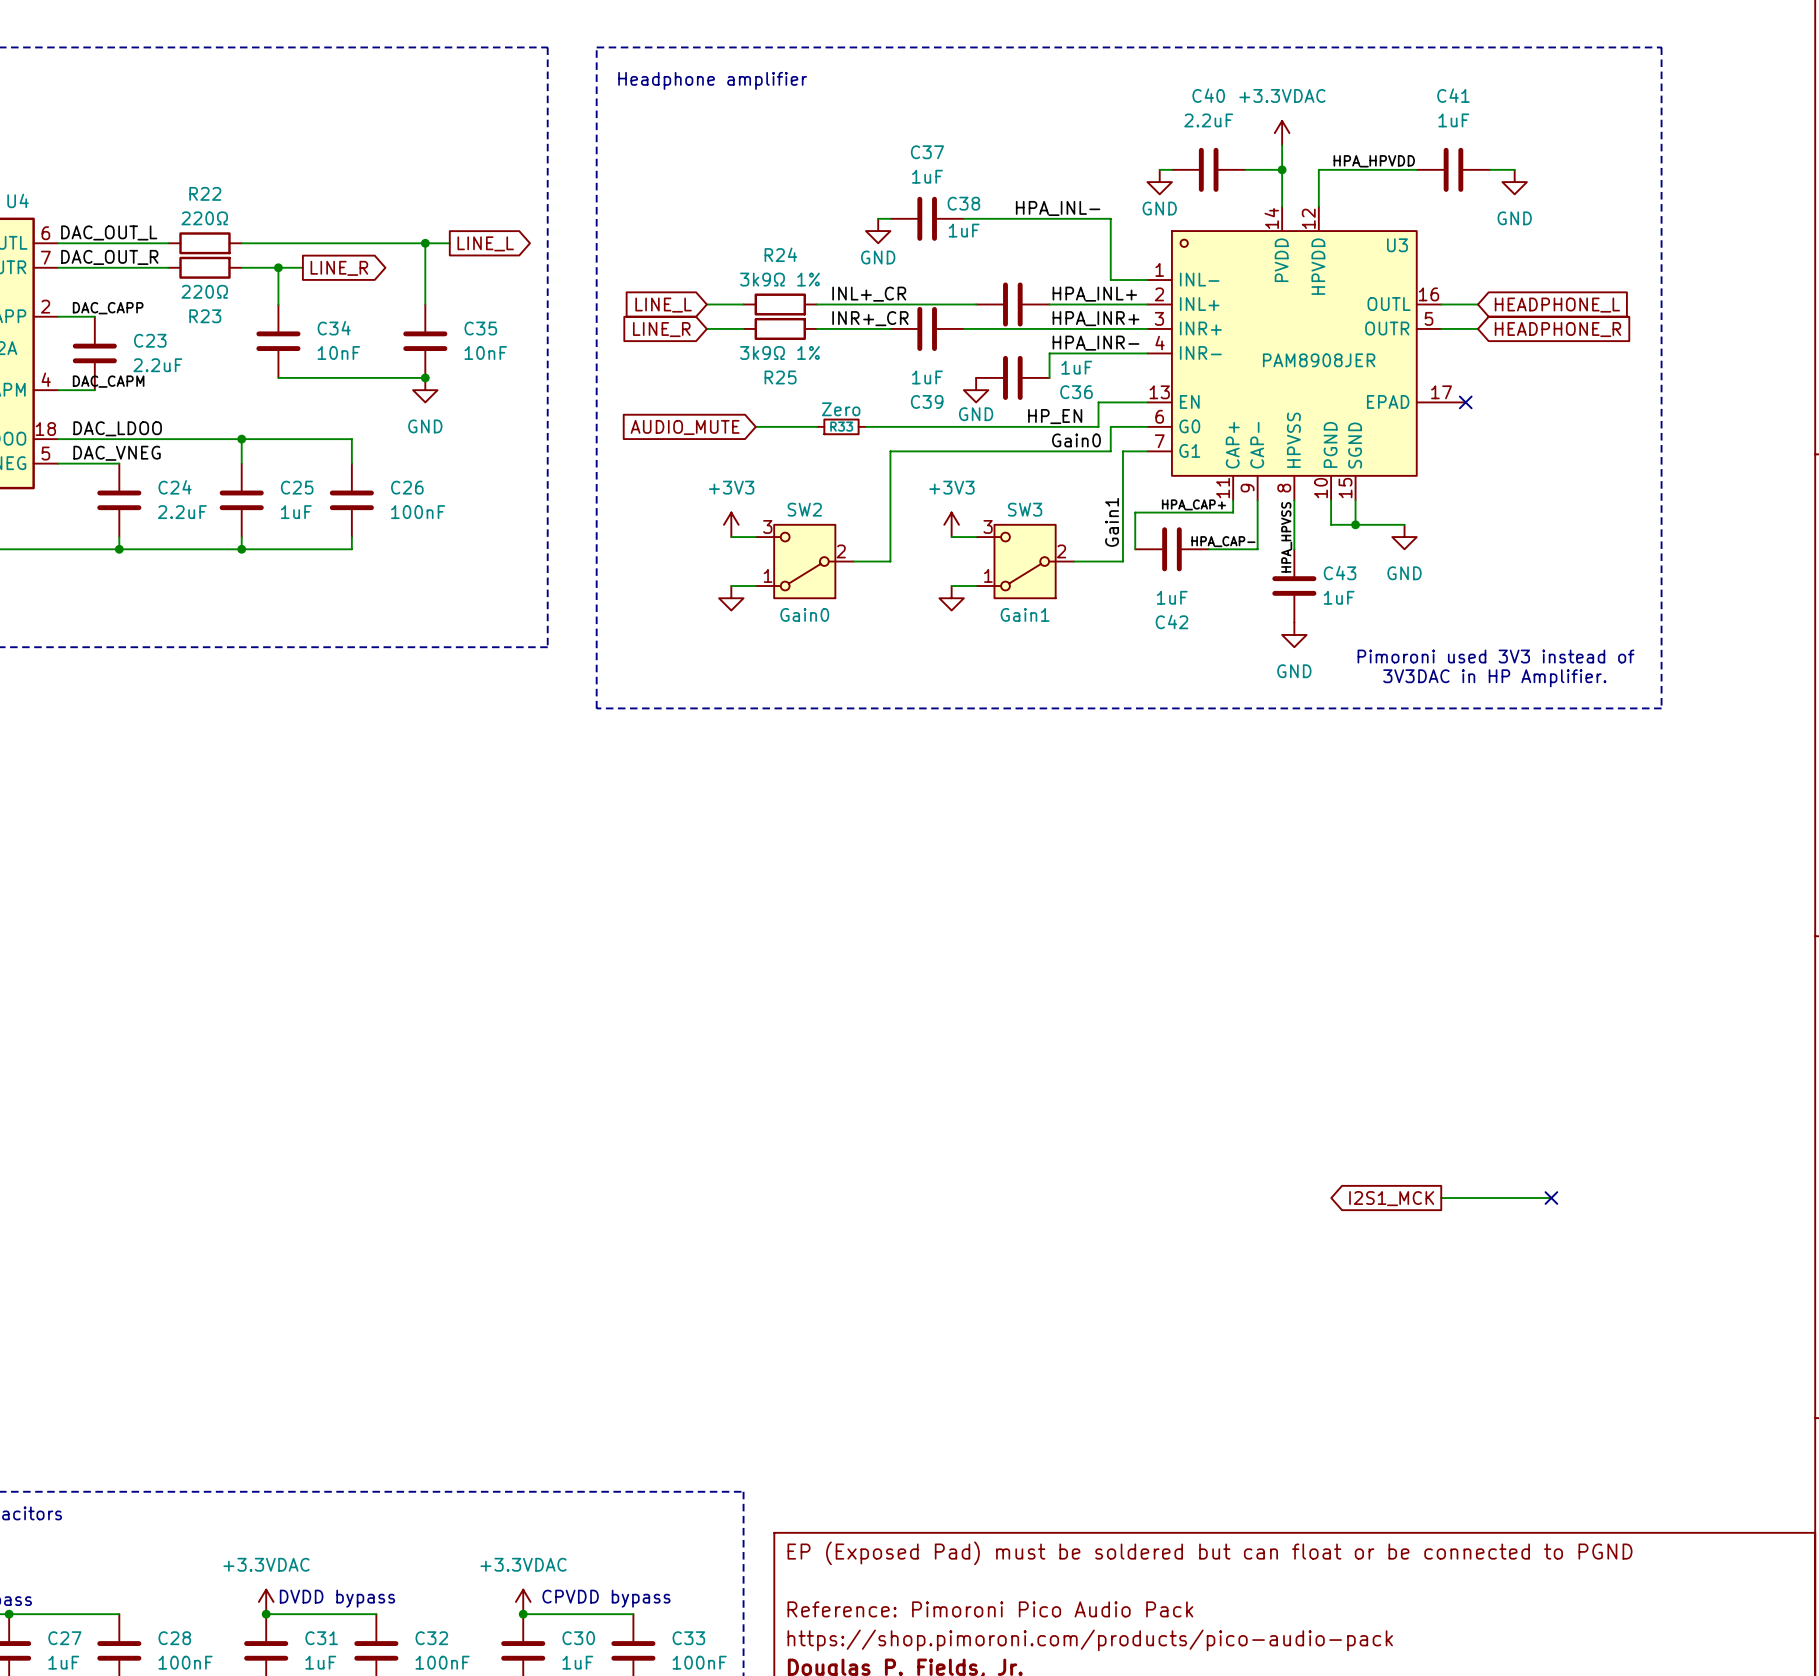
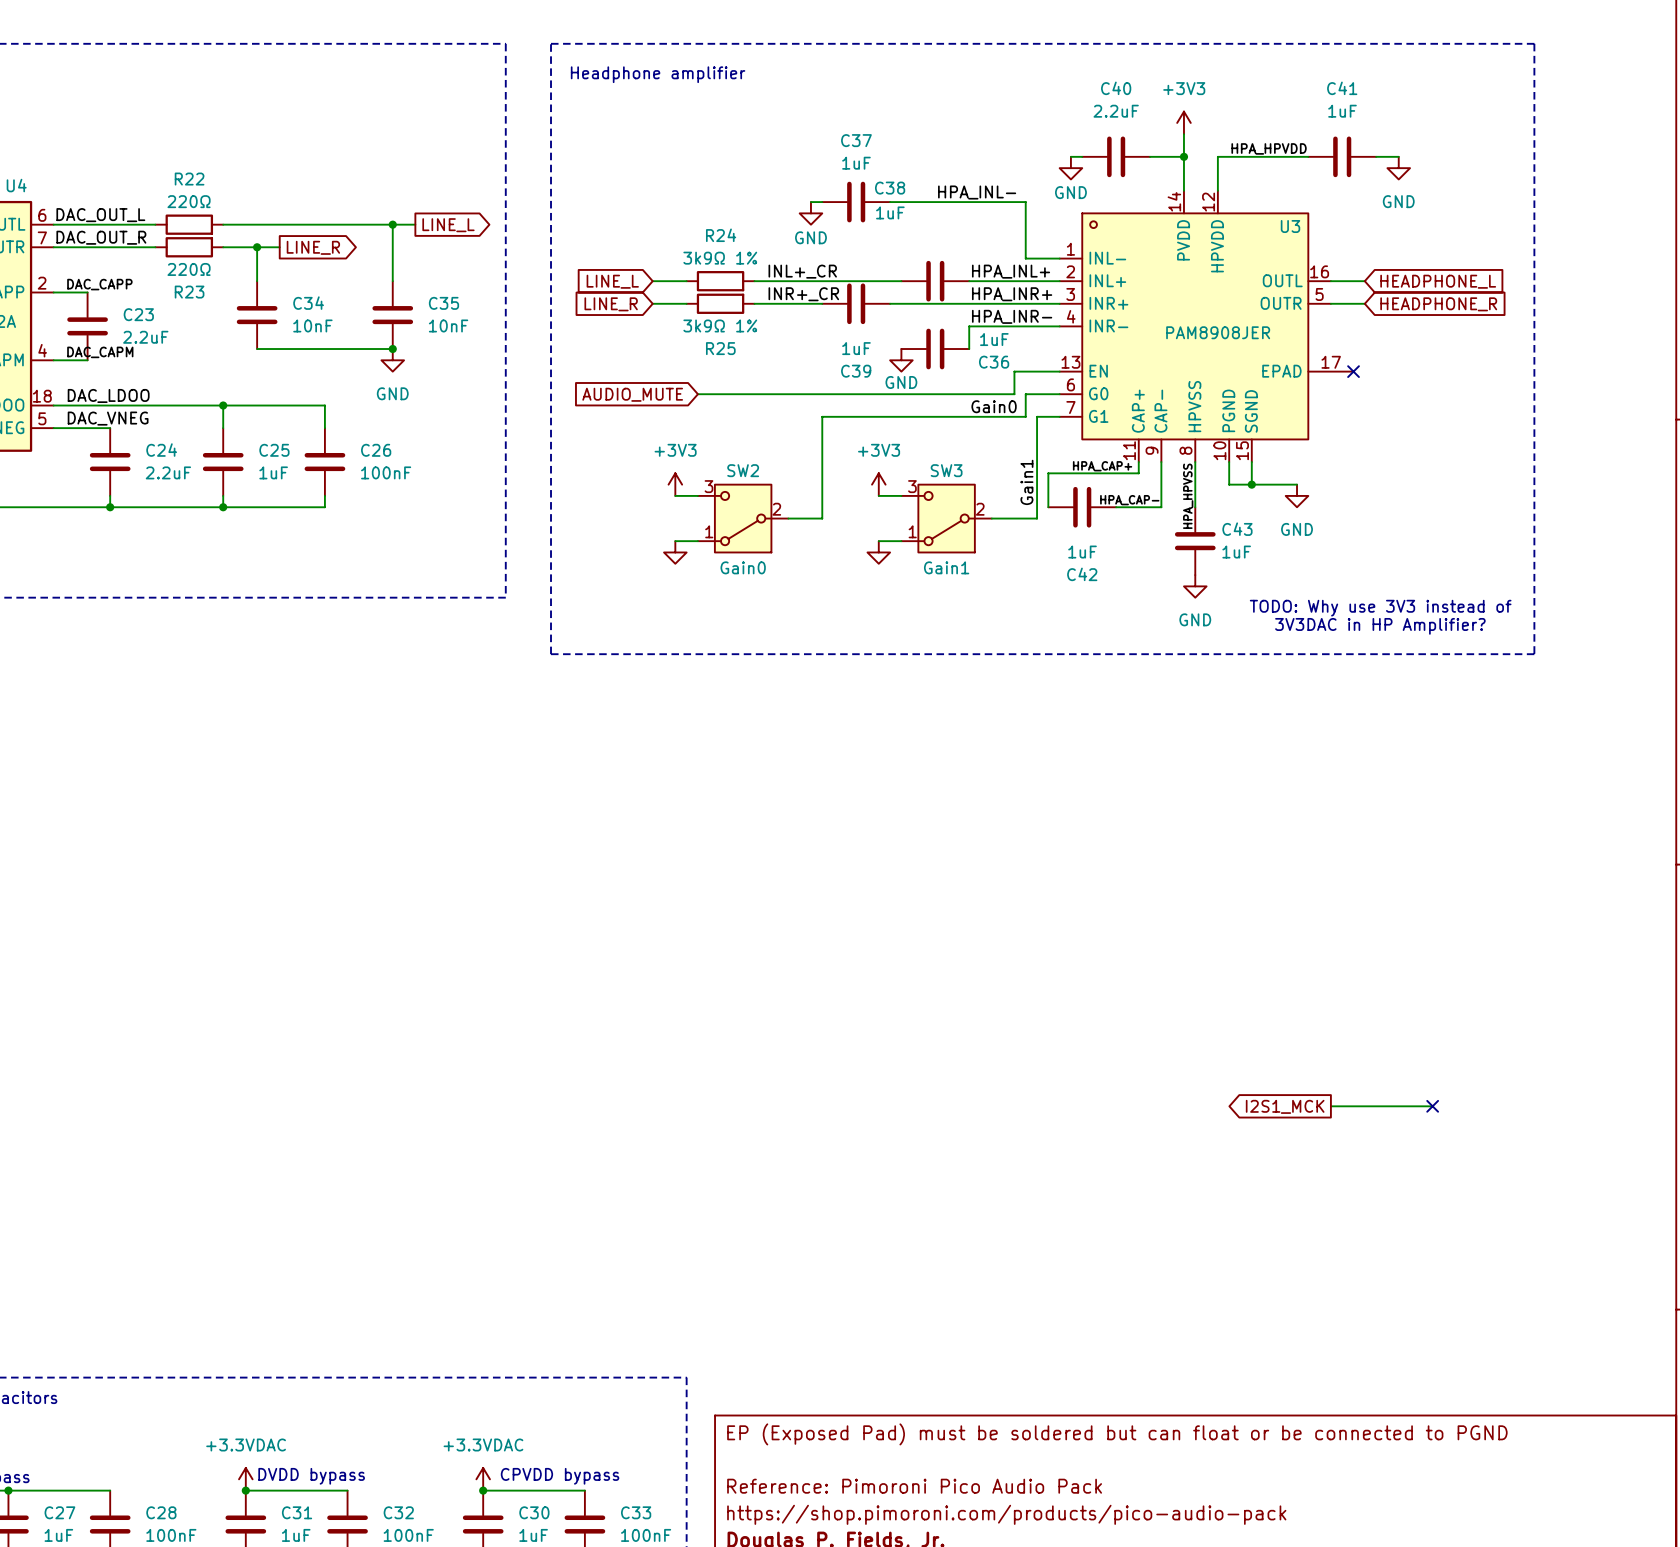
power symbol: +3.3VDAC (1282, 133) -> +3V3 (1183, 122)
label: HP_EN (1055, 416) -> none
R33: Zero (841, 426) -> none
text: Pimoroni used 3V3 instead of (1495, 656) -> TODO: Why use 3V3 instead of (1380, 608)
text: 3V3DAC in HP Amplifier. (1494, 678) -> 3V3DAC in HP Amplifier? (1380, 626)

